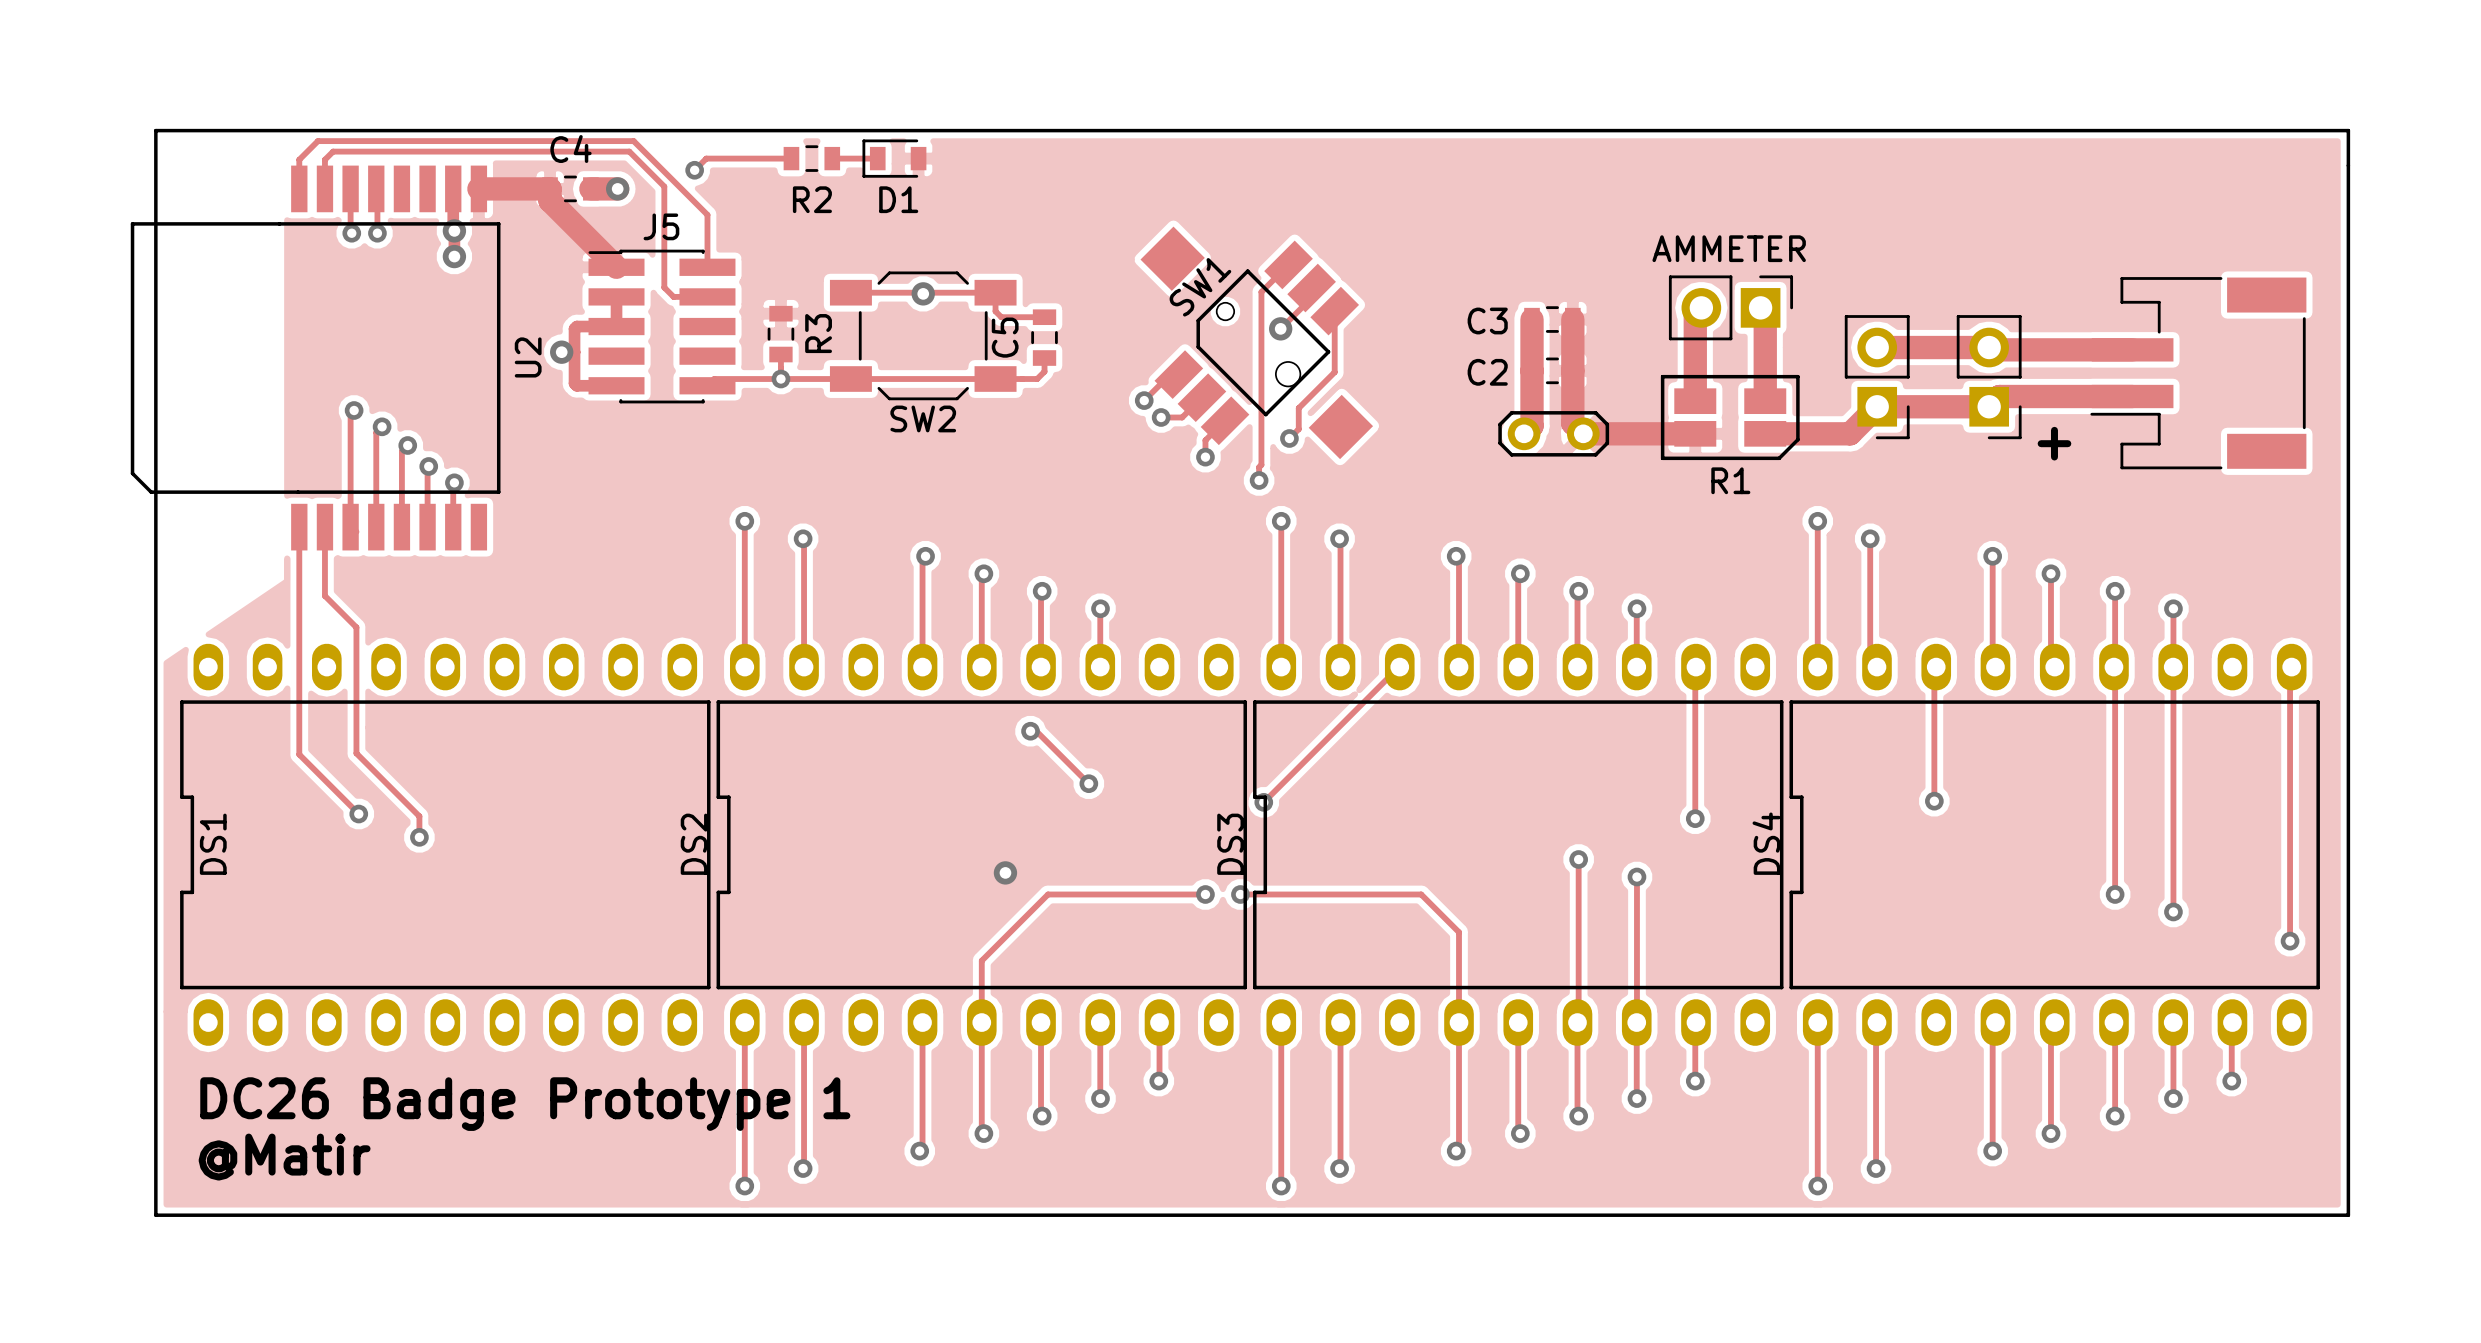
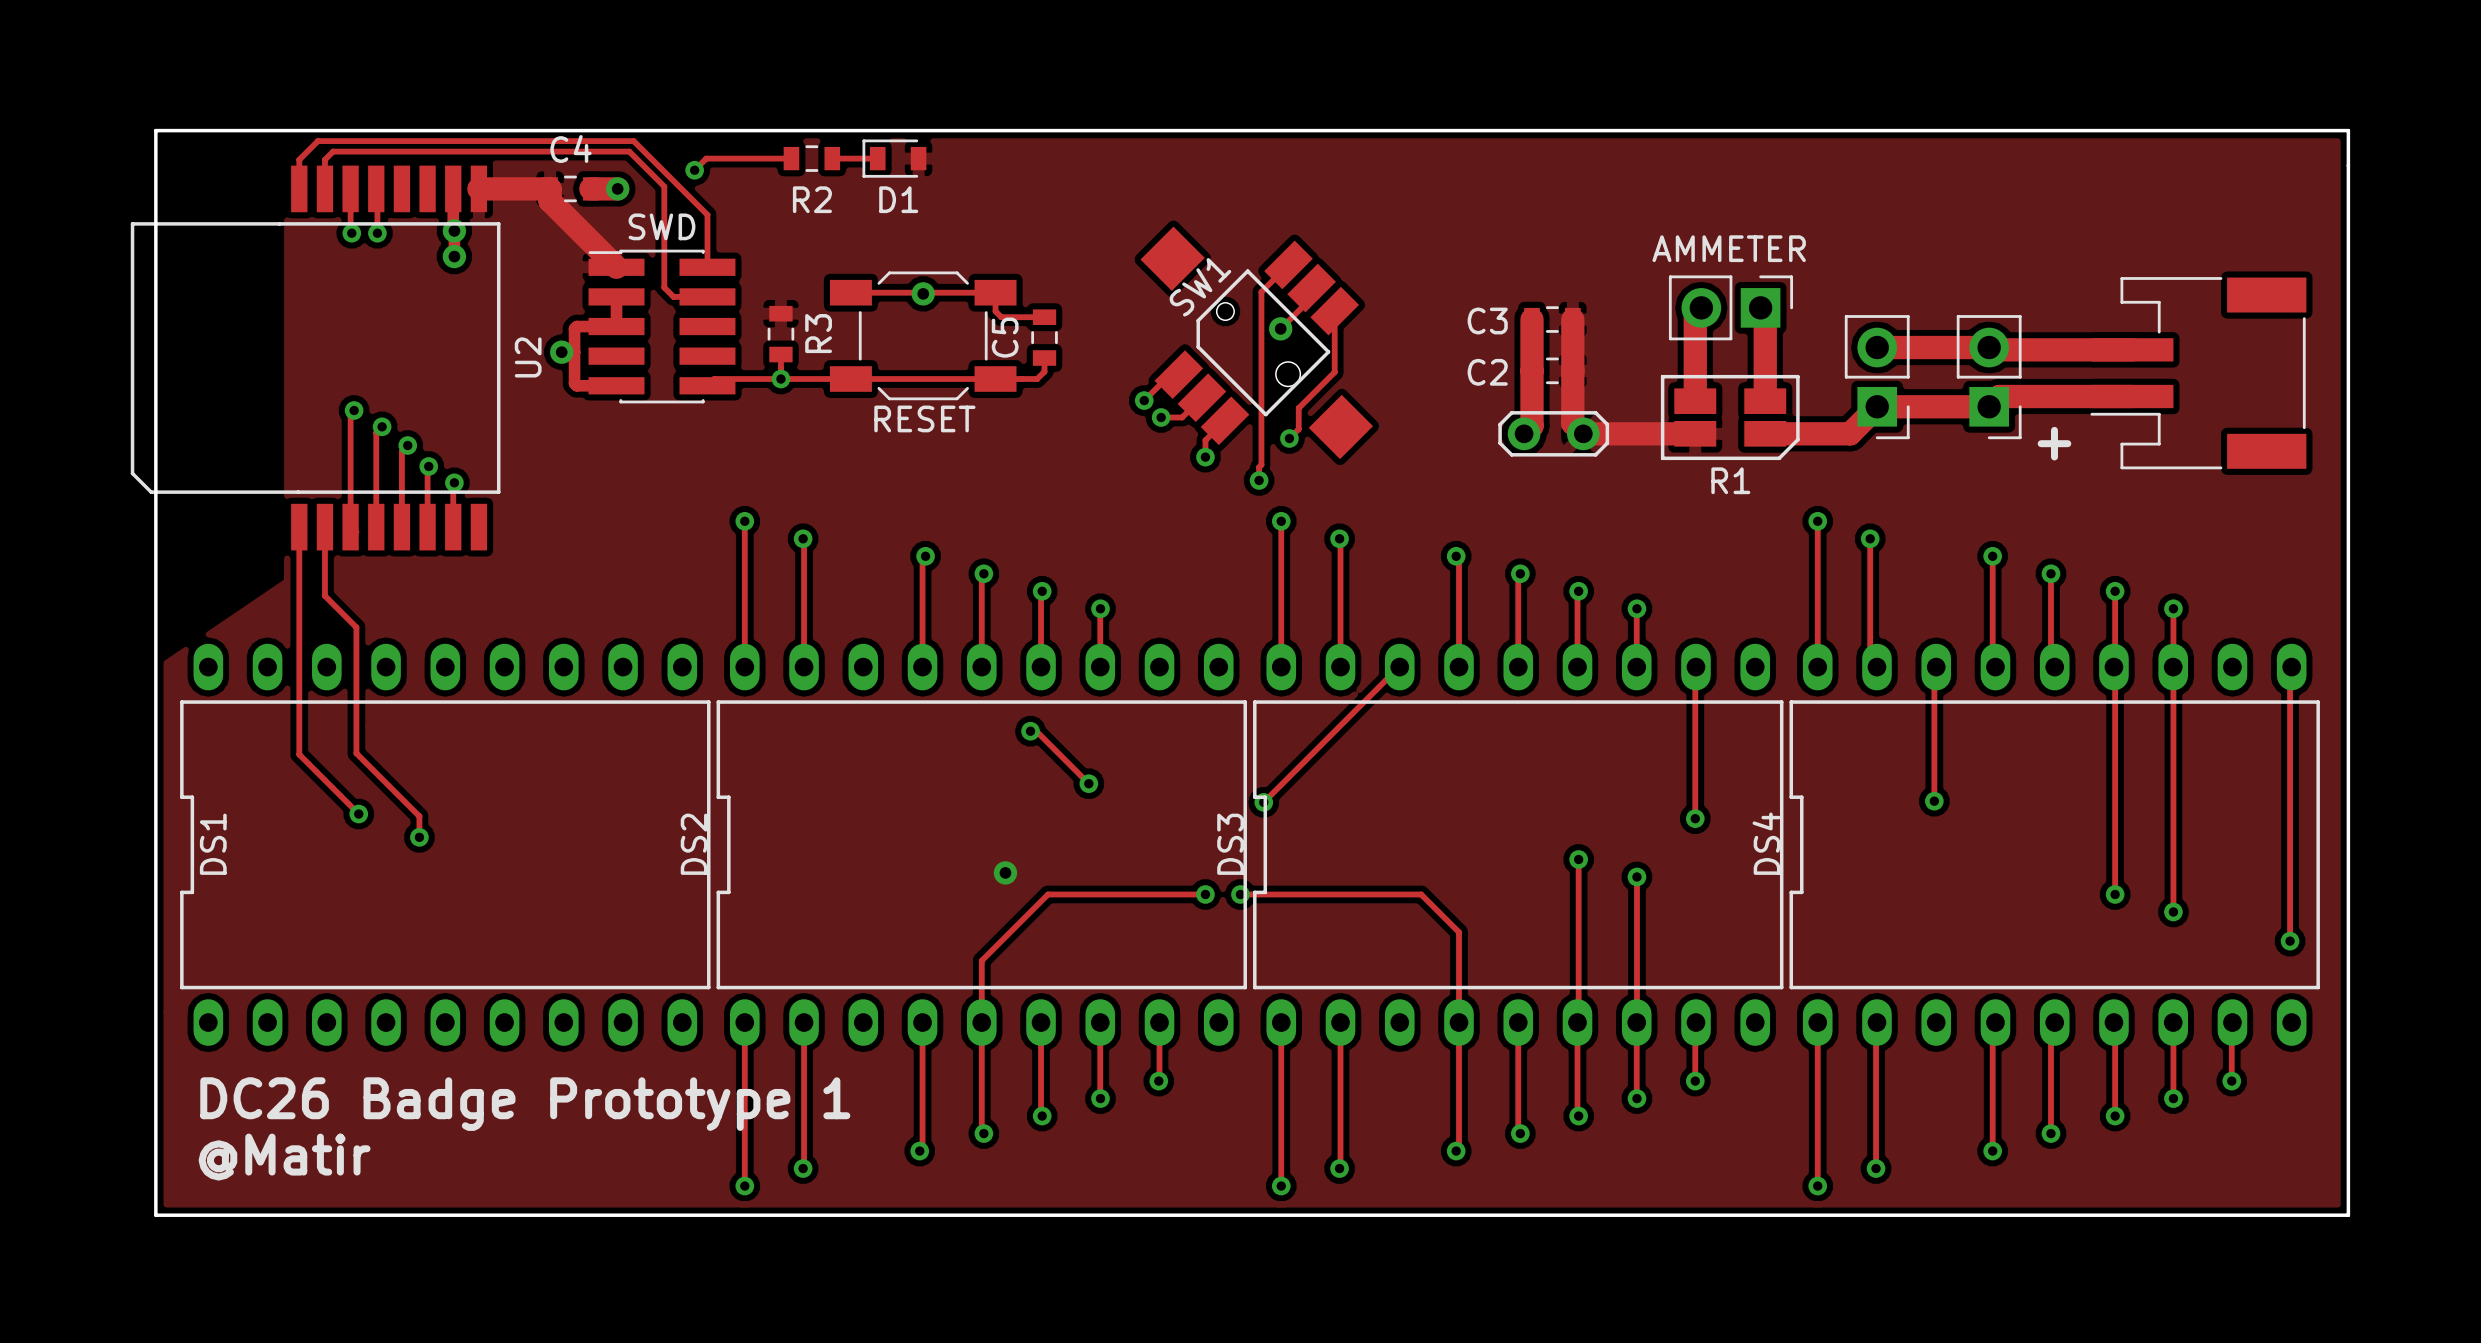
J5 name: J5 (661, 226) -> SWD (661, 226)
SW2 name: SW2 (923, 418) -> RESET (924, 418)

